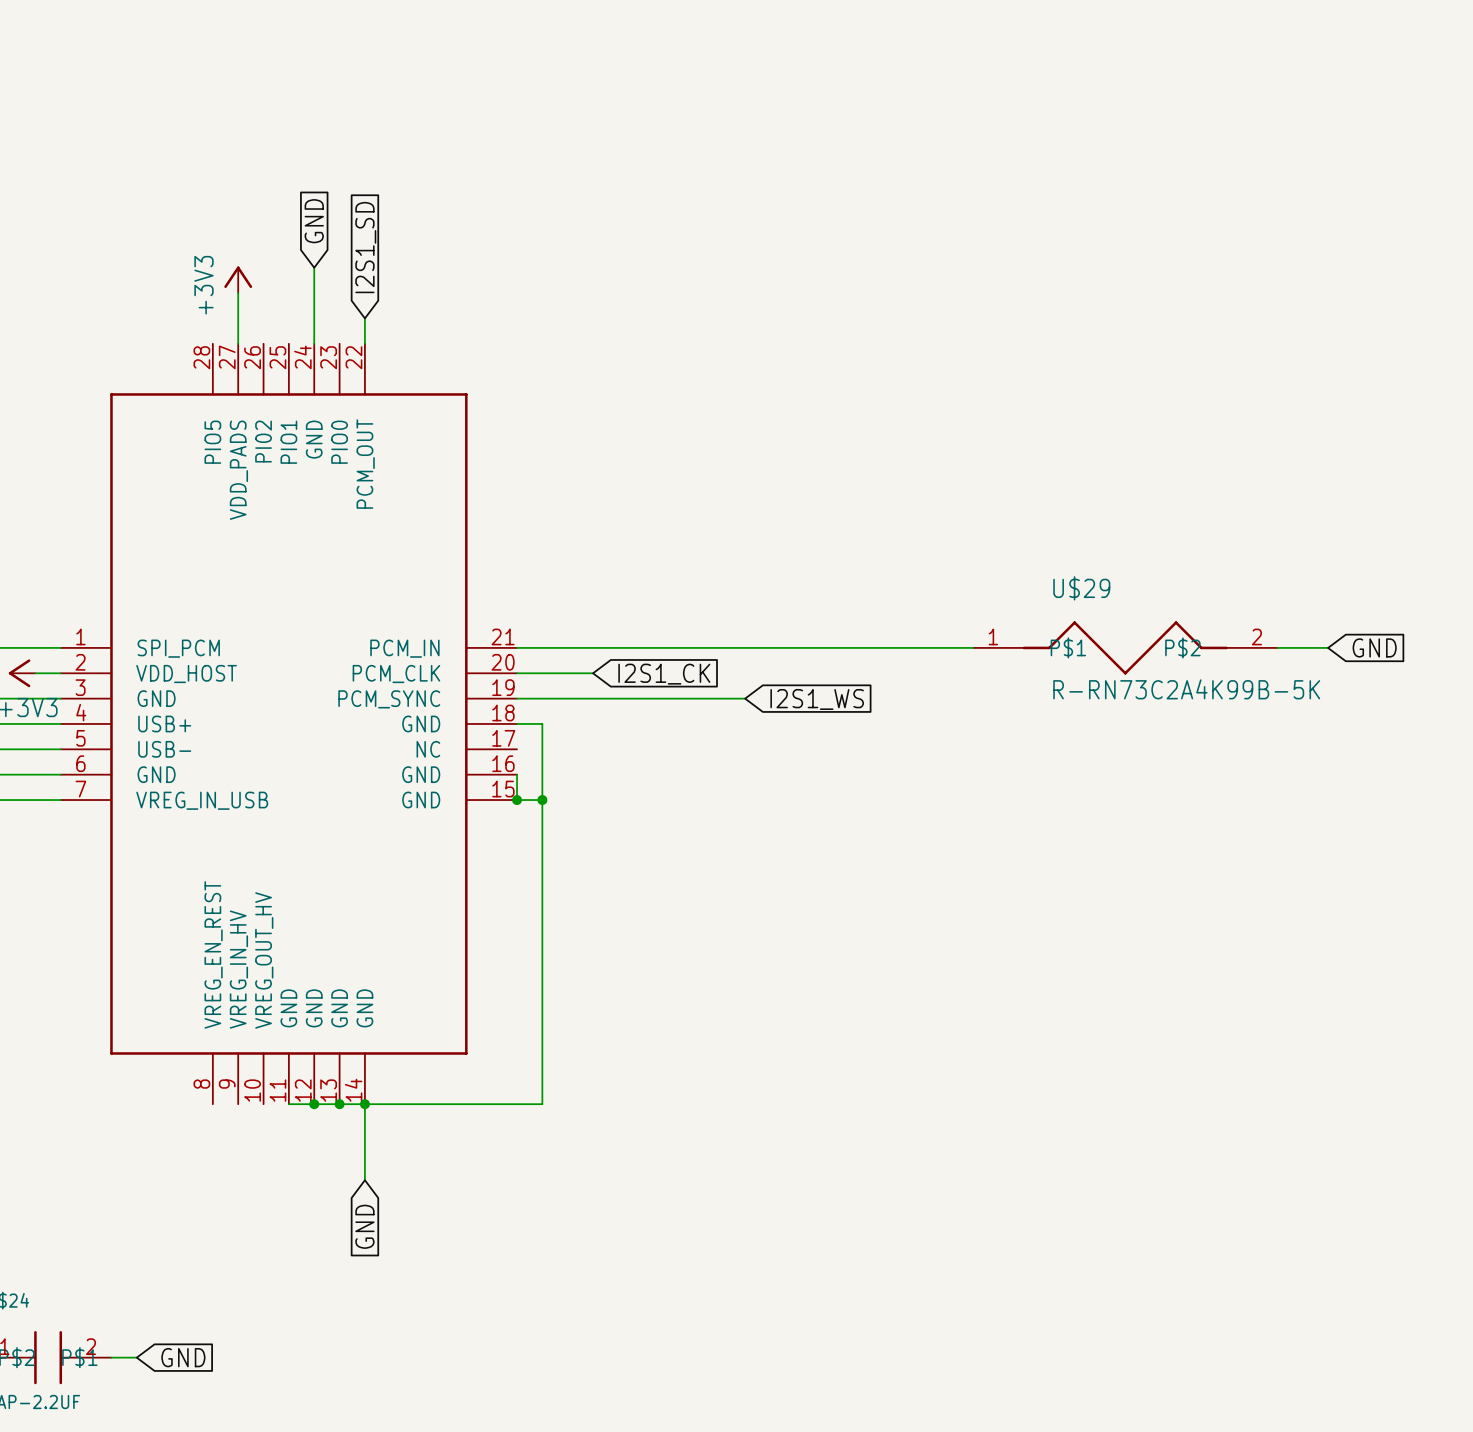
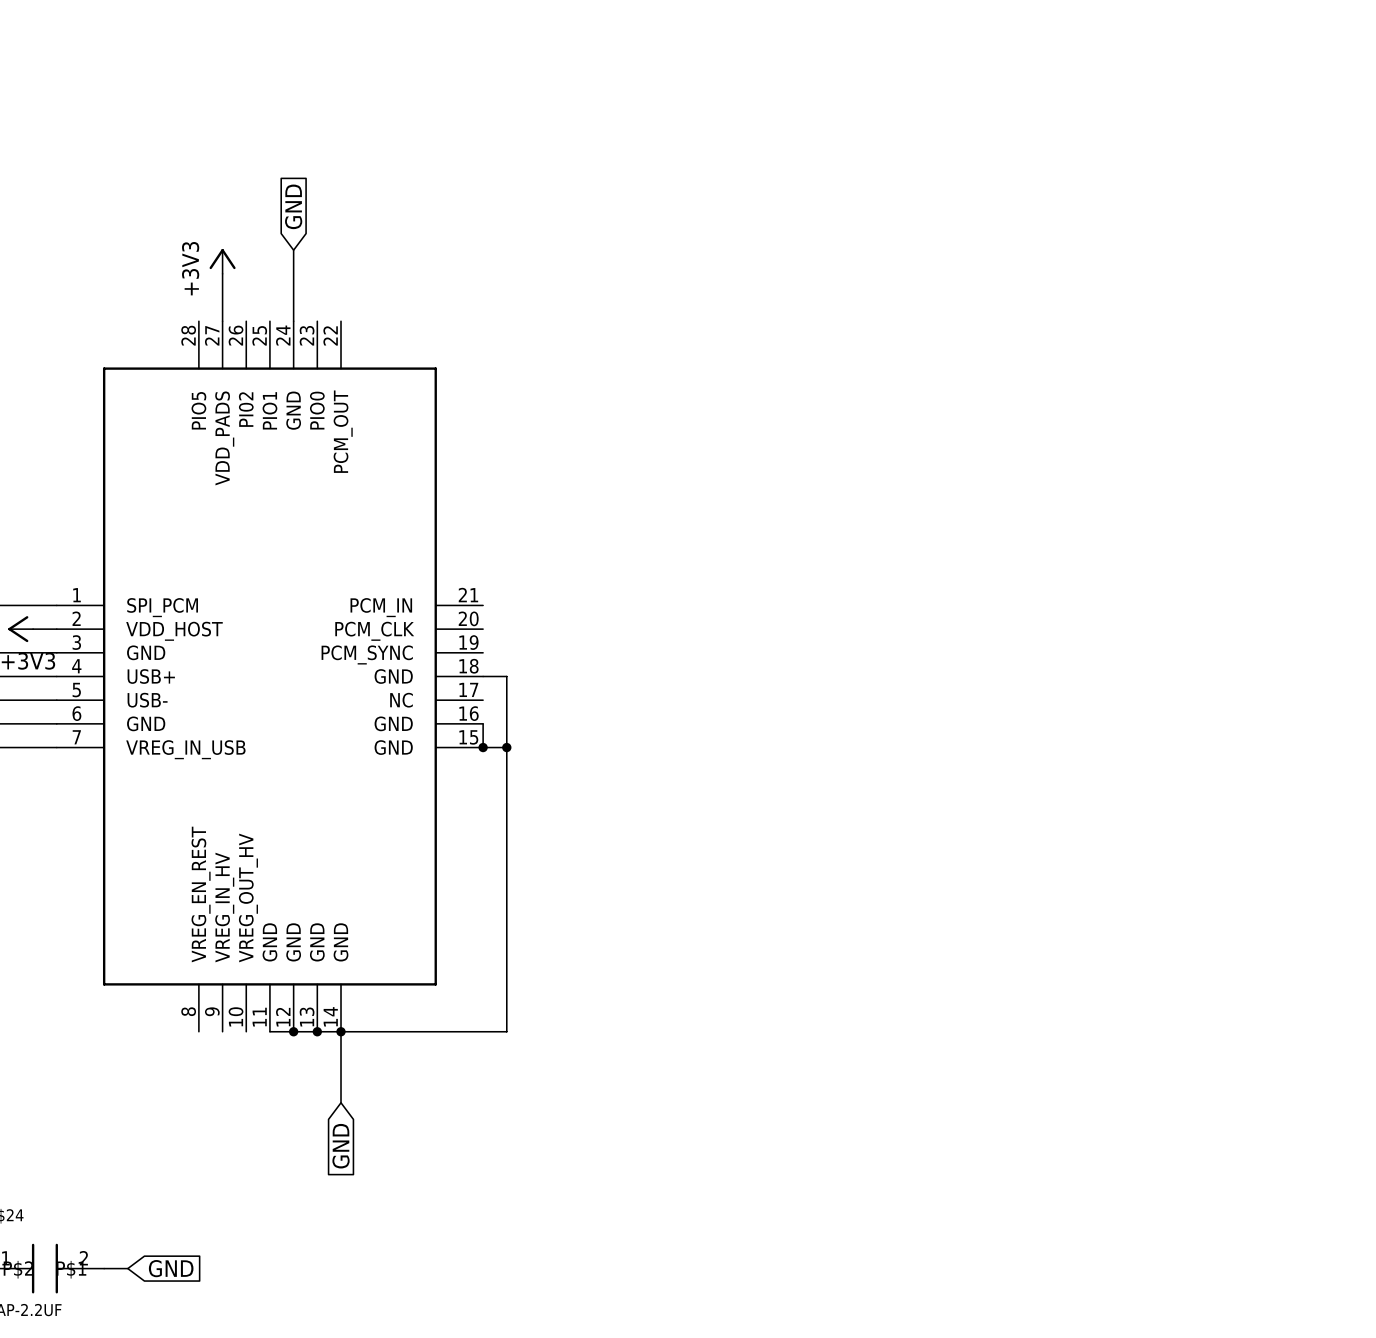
global label: I2S1_SD (365, 247) -> none
wire: (364, 318) (364, 343) -> none
wire: (517, 647) (973, 647) -> none
U$29: R-RN73C2A4K99B-5K (1125, 647) -> none
wire: (1277, 647) (1328, 647) -> none
global label: GND (1374, 647) -> none
wire: (517, 673) (593, 673) -> none
global label: I2S1_CK (664, 674) -> none
wire: (517, 698) (745, 698) -> none
global label: I2S1_WS (817, 699) -> none

